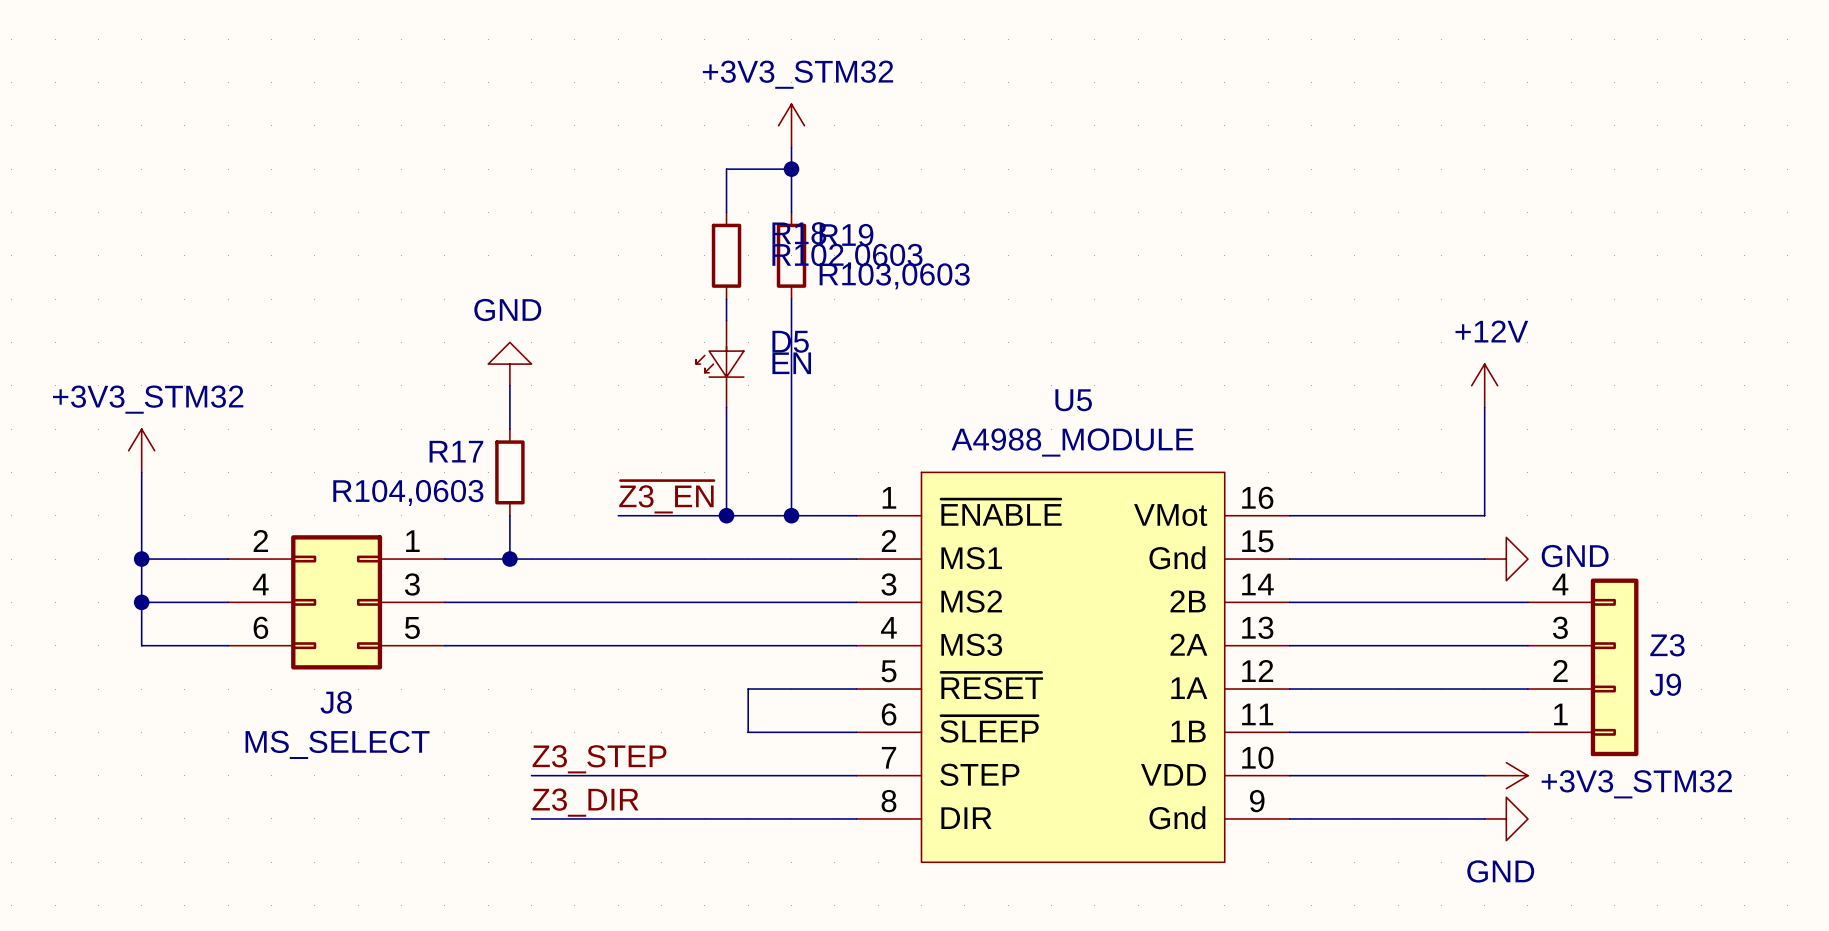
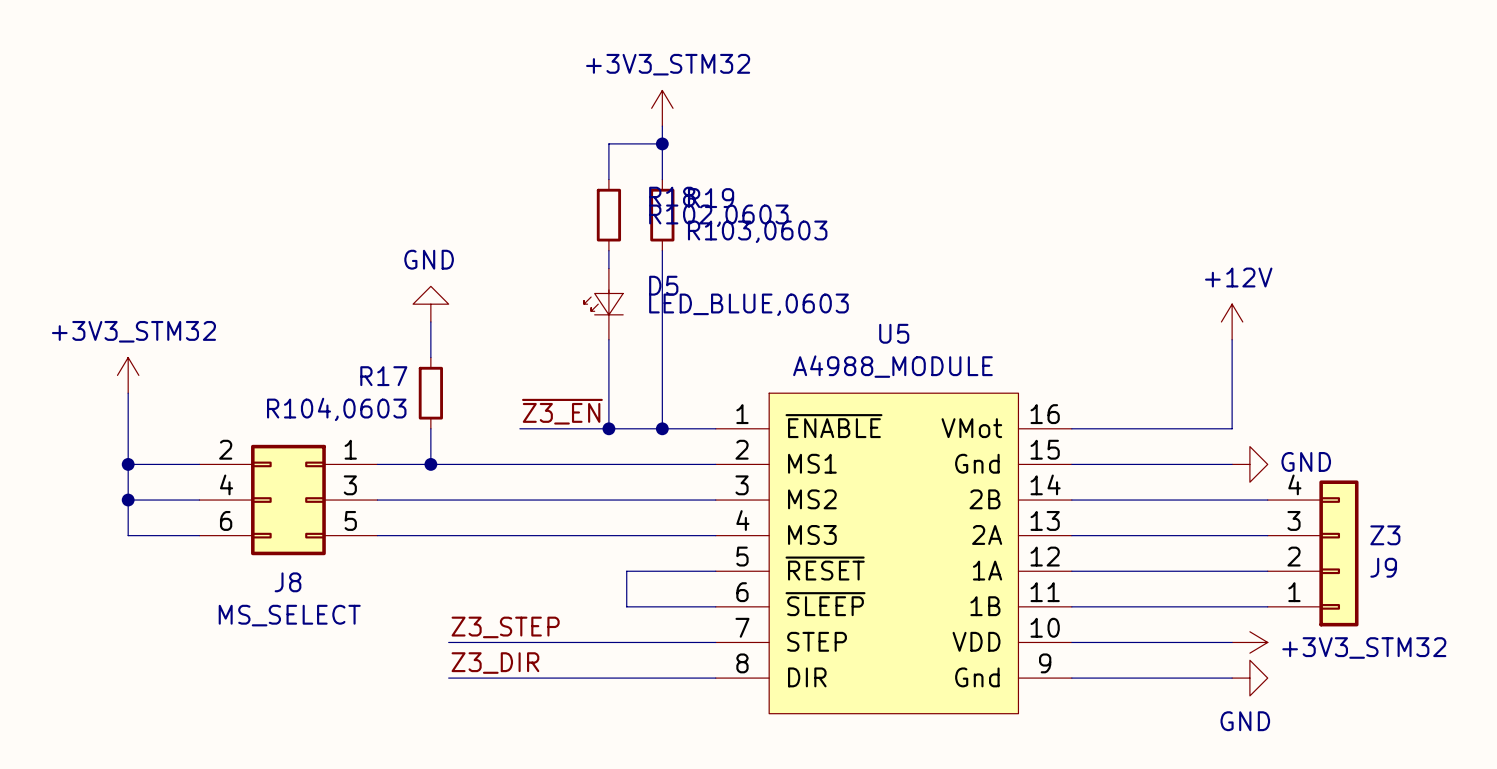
D5 value: EN (791, 363) -> LED_BLUE,0603 (748, 304)

